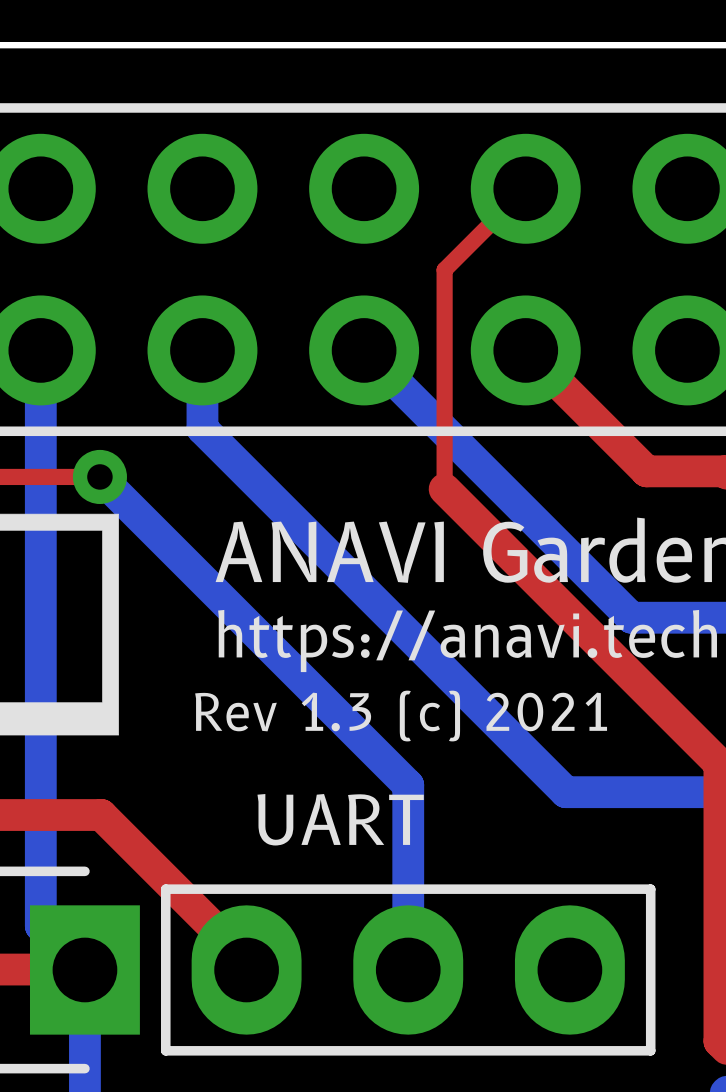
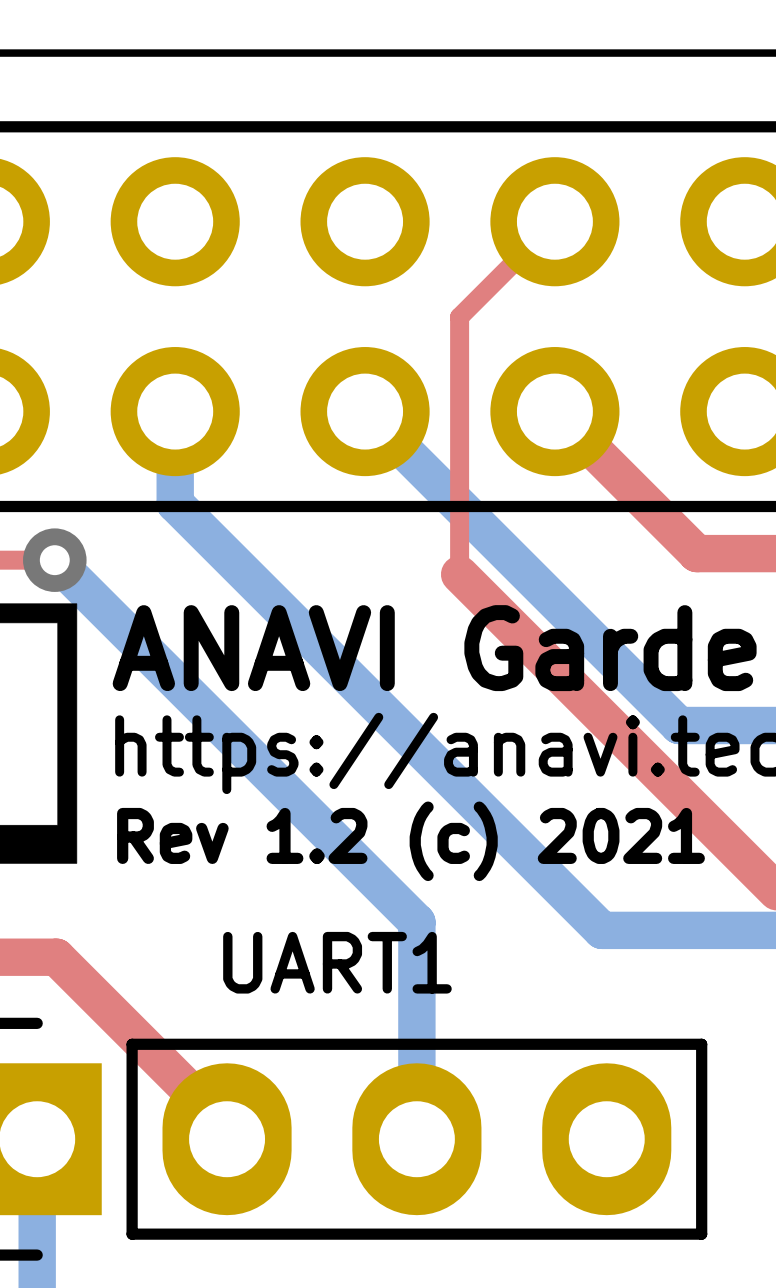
text: Rev 1.3 (c) 2021 (401, 716) -> Rev 1.2 (c) 2021 (410, 841)
UART name: UART (340, 819) -> UART1 (337, 962)

